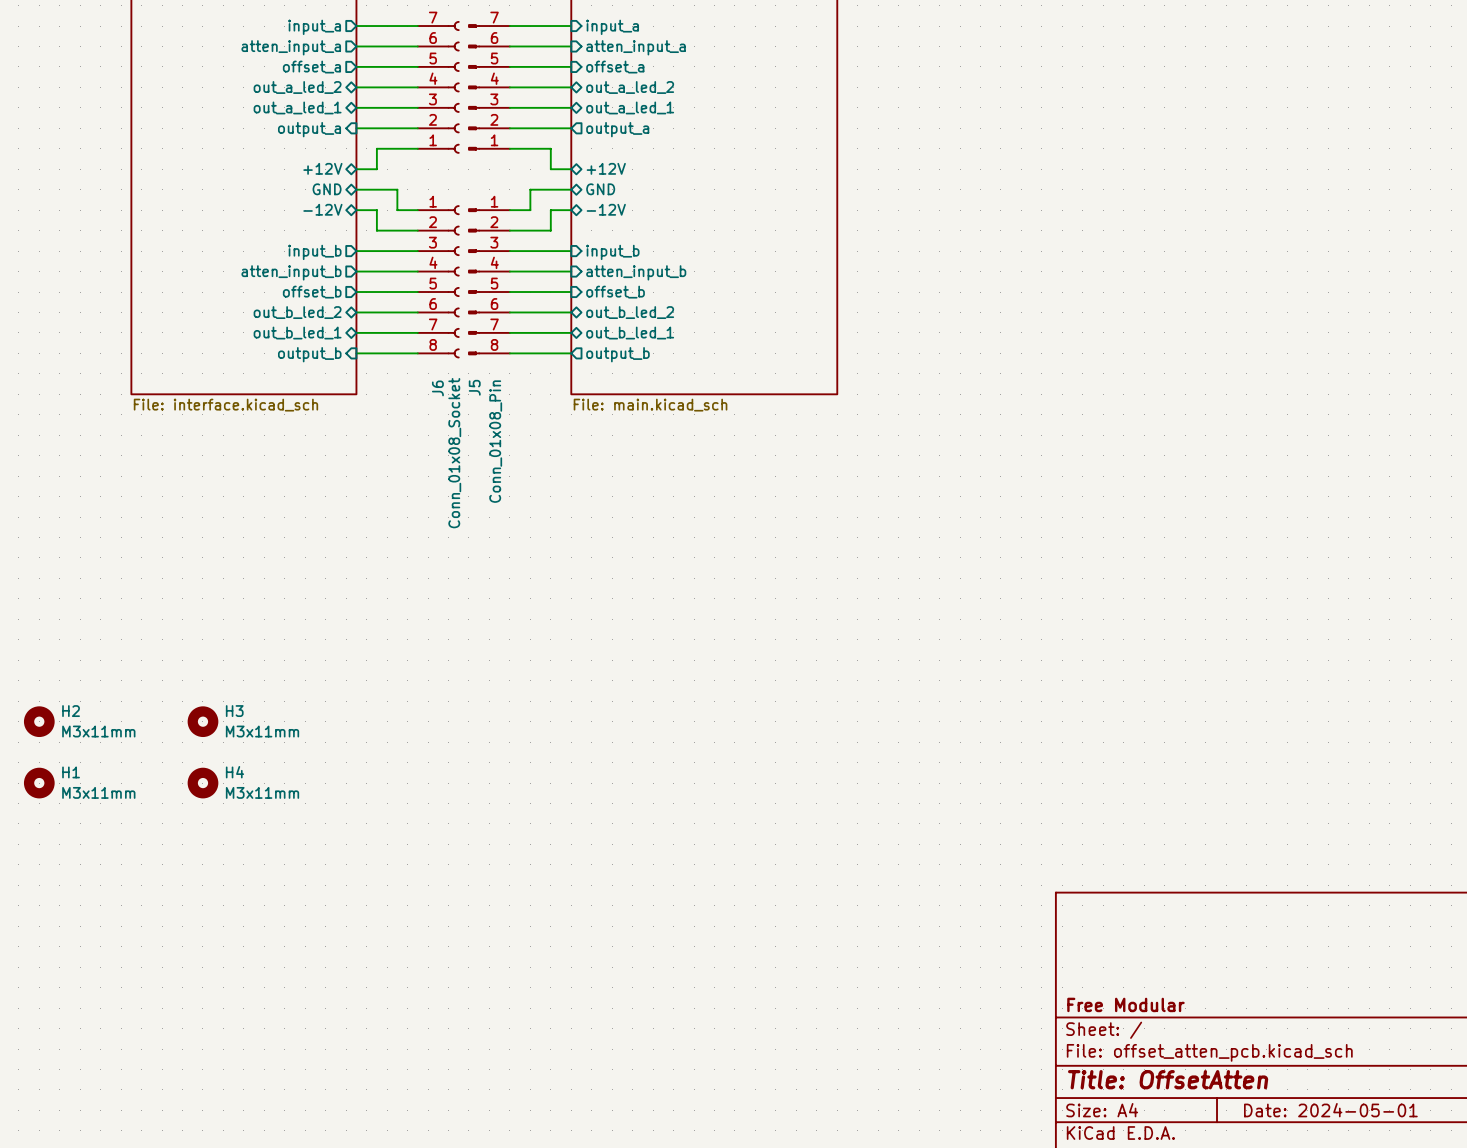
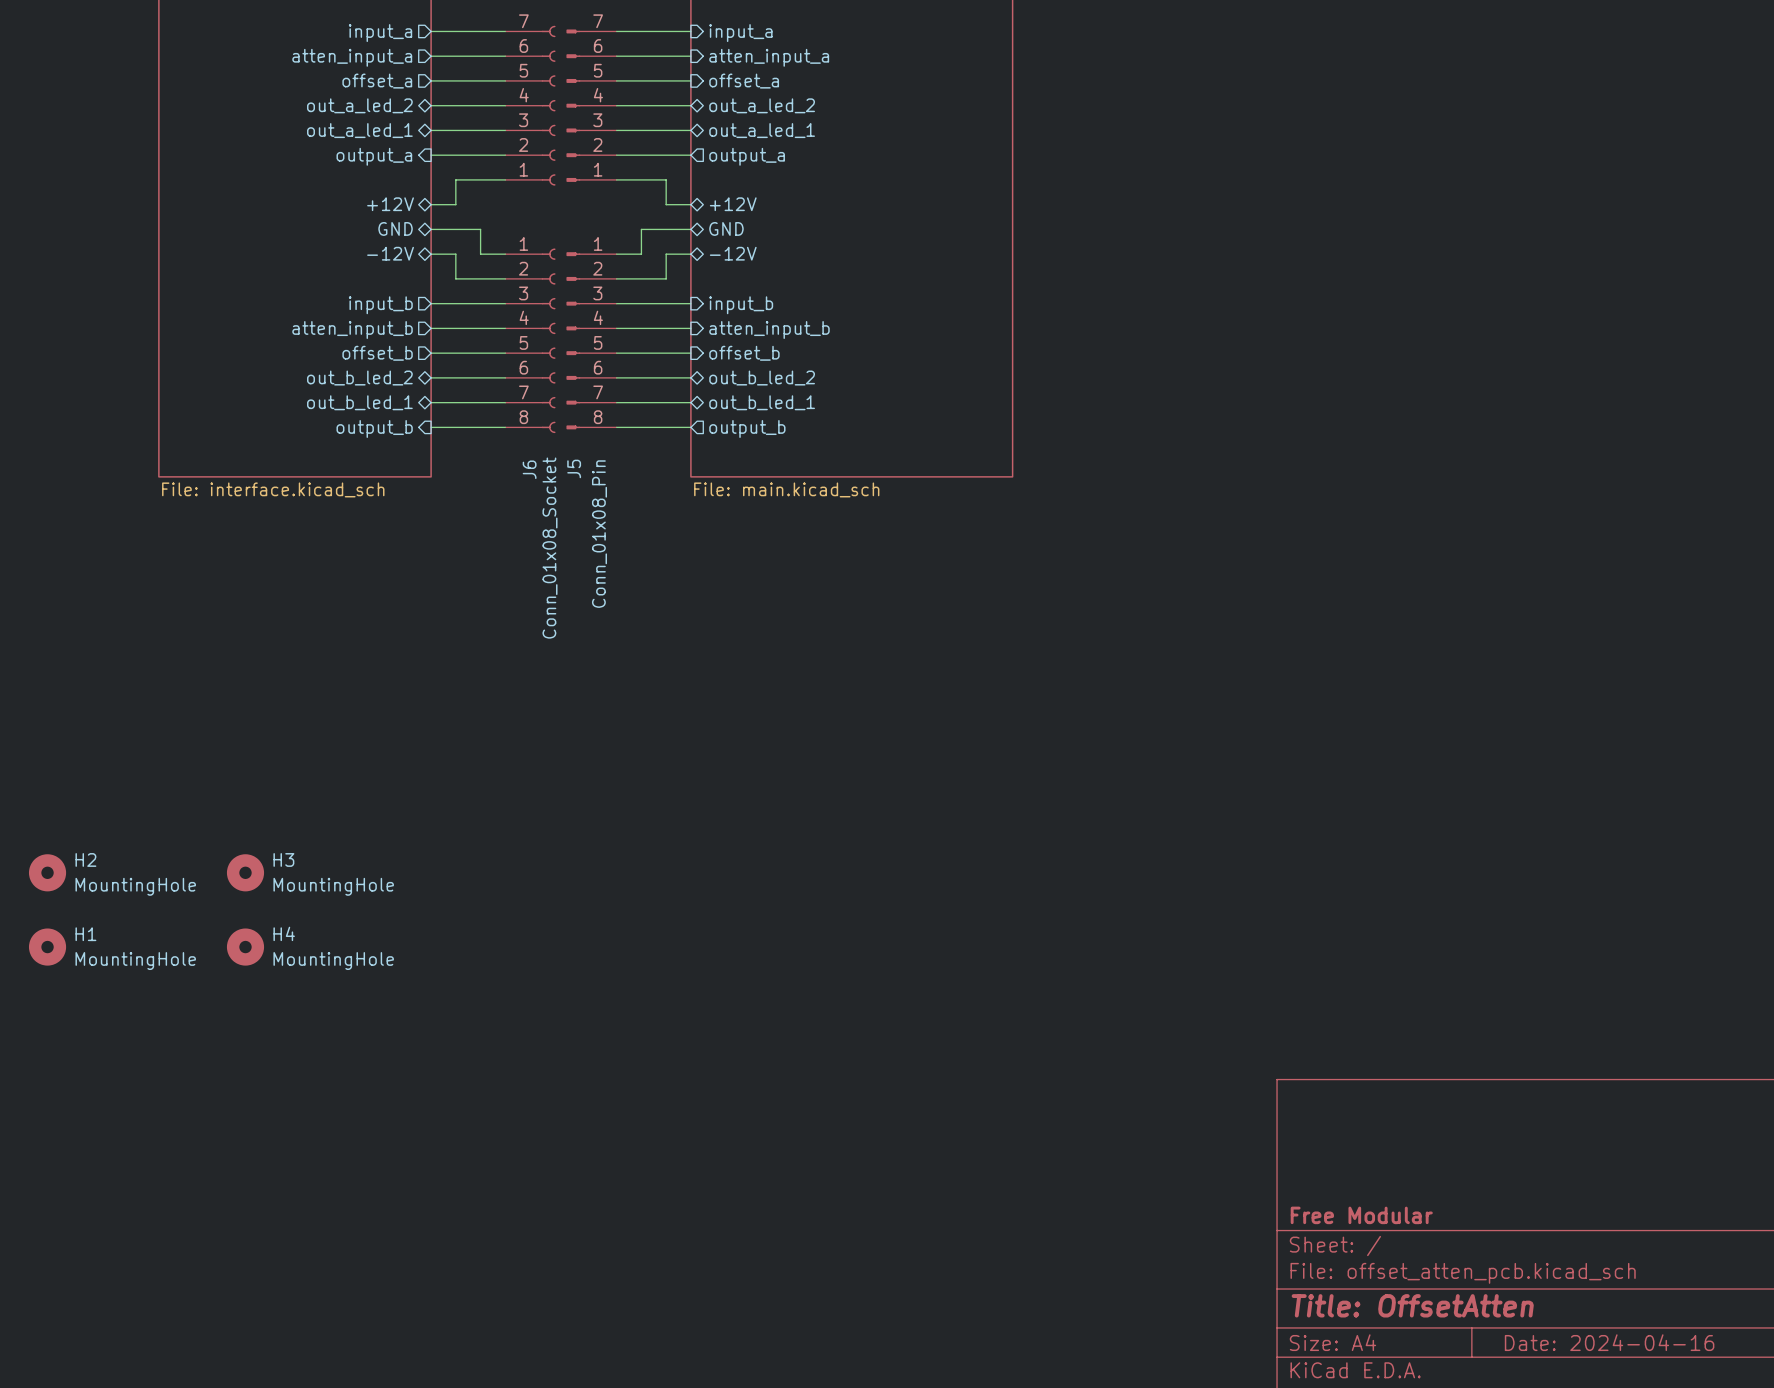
H2 value: M3x11mm (98, 731) -> MountingHole (135, 886)
H3 value: M3x11mm (262, 731) -> MountingHole (333, 886)
H1 value: M3x11mm (98, 792) -> MountingHole (135, 961)
H4 value: M3x11mm (262, 792) -> MountingHole (333, 961)
title block: Date: 2024-05-01 (1330, 1110) -> Date: 2024-04-16 (1609, 1342)

